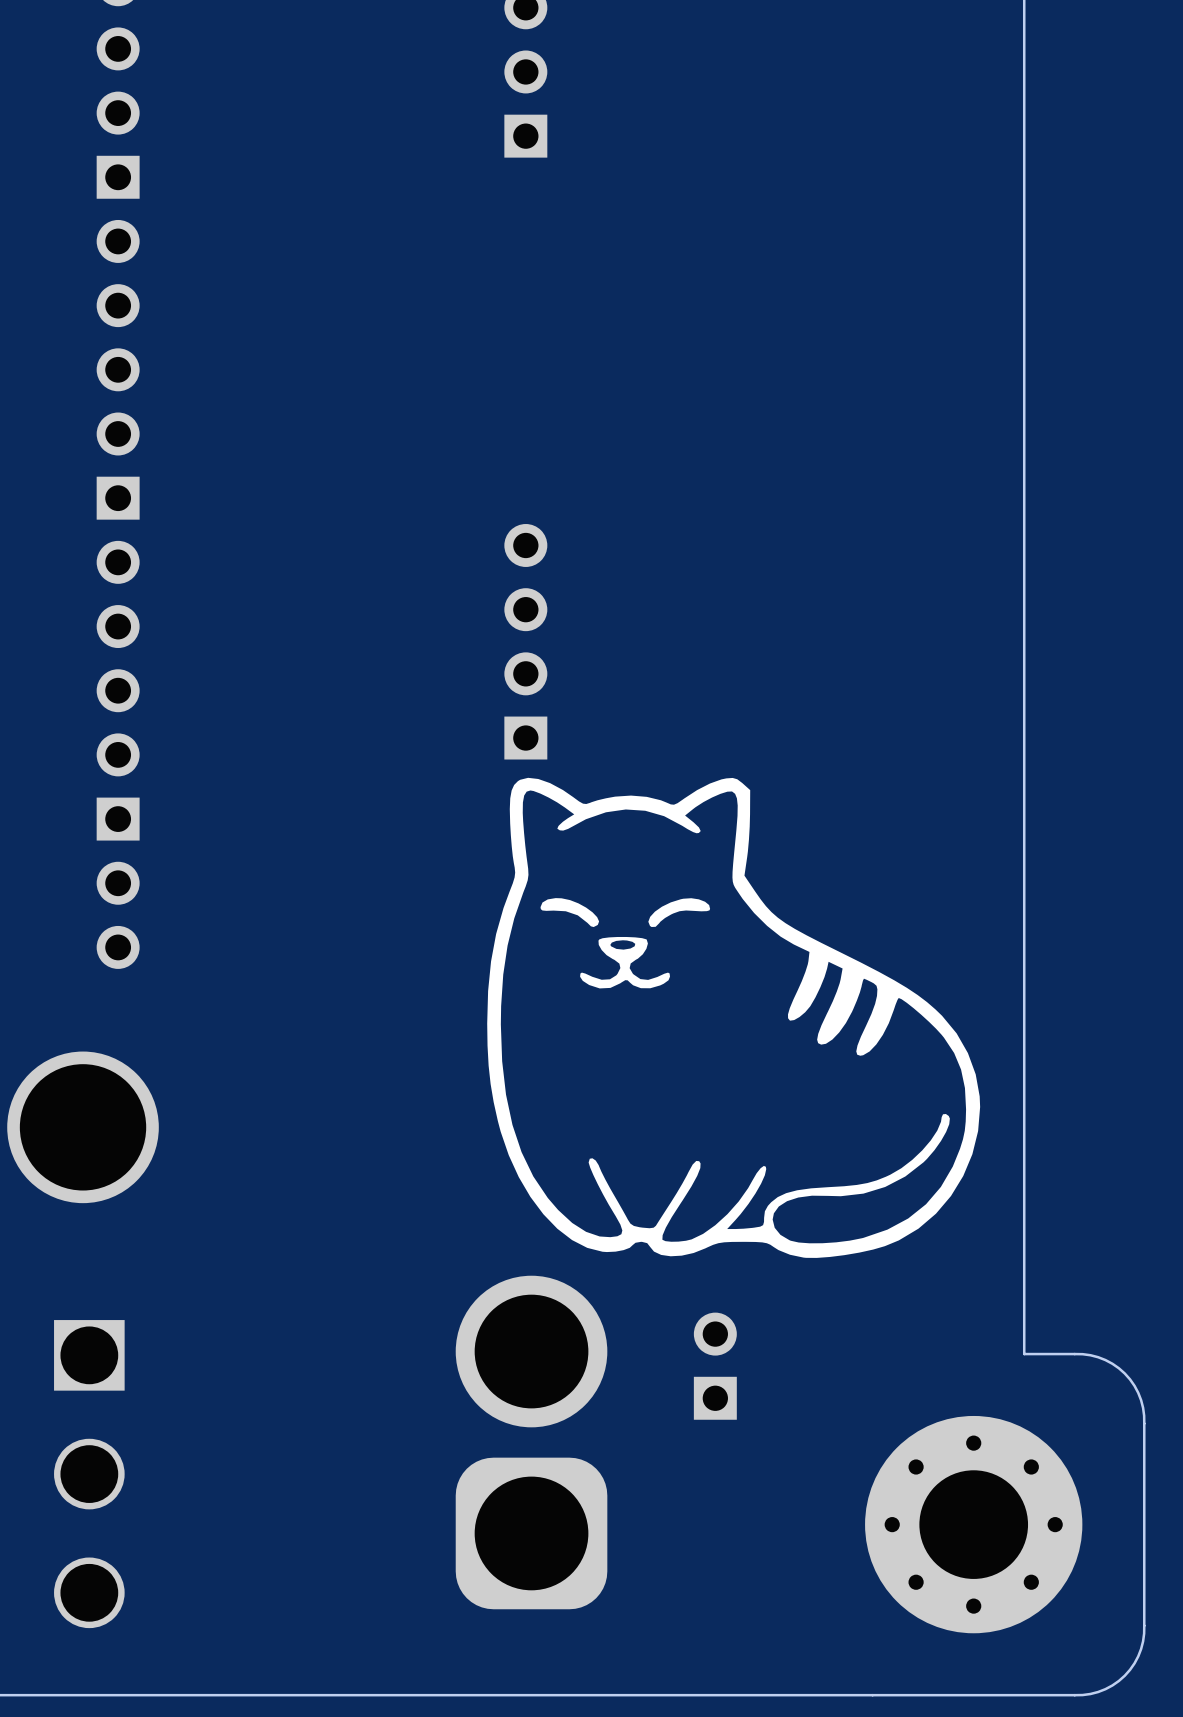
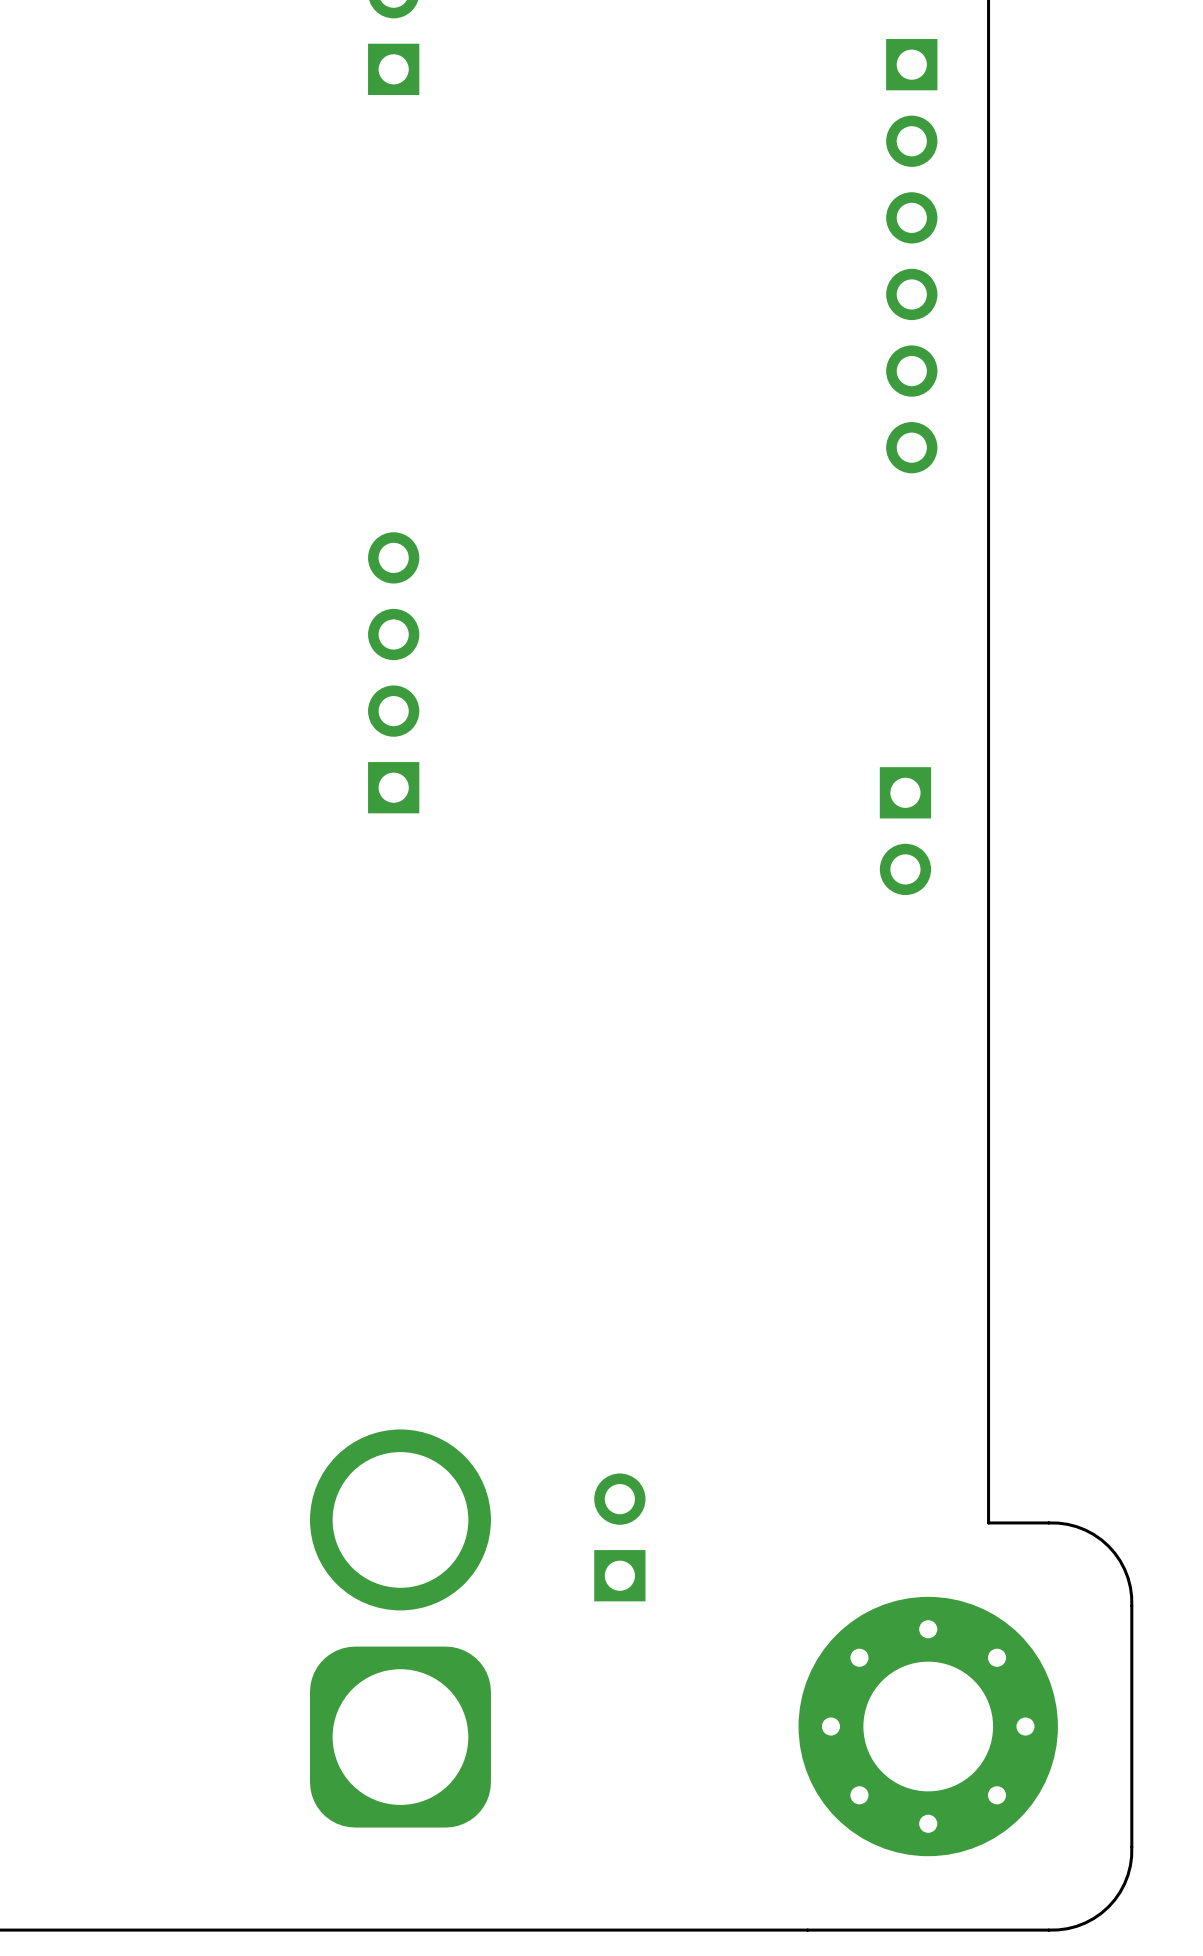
part: none -> (911, 256)
part: none -> (905, 831)
drawing: [487, 777, 981, 1258] -> none

